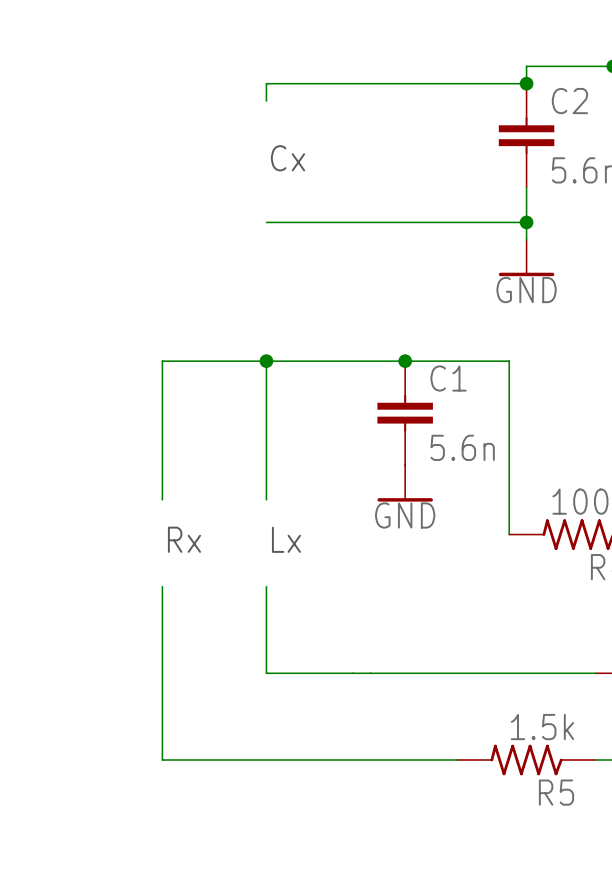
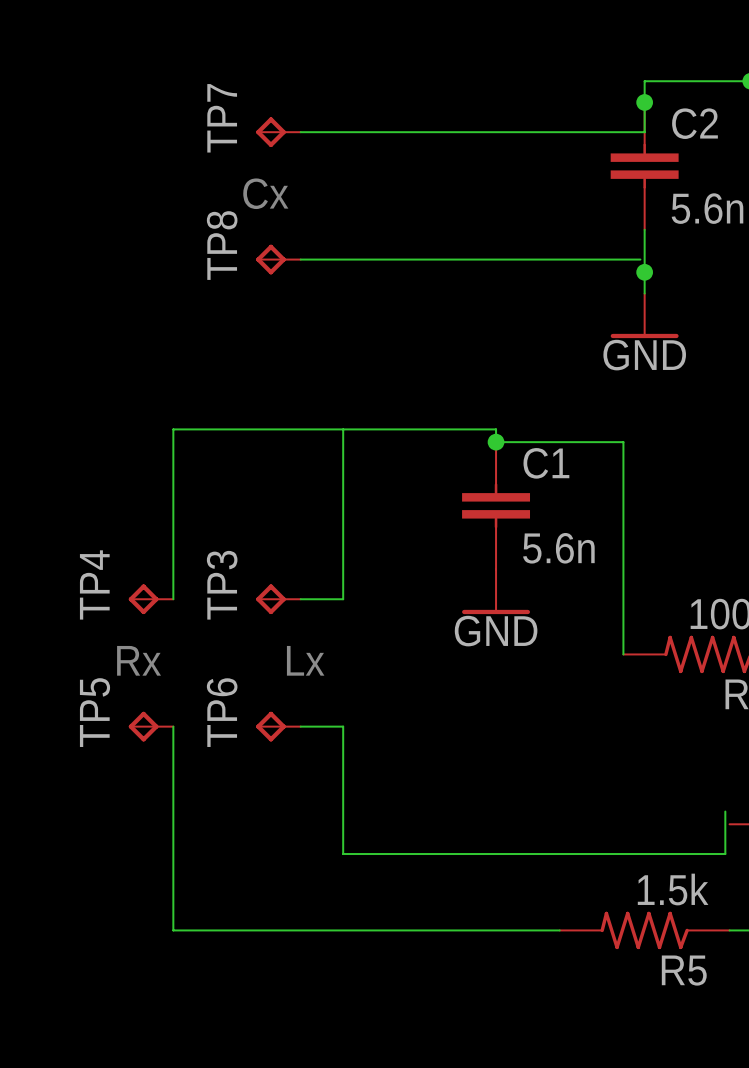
wire: (526, 83) (266, 83) (266, 101) -> (644, 102) (644, 132) (300, 132)
TP7: none -> (278, 132)
text position: Cx (288, 158) -> Cx (265, 193)
TP8: none -> (278, 259)
wire: none -> (300, 259) (640, 259)
wire: (266, 222) (526, 222) -> none
wire: none -> (343, 429) (343, 599) (300, 599)
wire: (266, 361) (266, 499) -> none
junction: (266, 361) -> none
wire: (405, 361) (162, 361) (162, 499) -> (496, 442) (496, 429) (173, 429) (173, 599)
TP4: none -> (151, 599)
TP3: none -> (278, 599)
text position: Rx (184, 539) -> Rx (139, 660)
text position: Lx (286, 539) -> Lx (305, 660)
wire: (162, 586) (162, 760) -> (173, 726) (173, 930) (198, 930)
wire: (266, 586) (266, 673) (595, 673) -> none
TP5: none -> (151, 726)
TP6: none -> (278, 726)
wire: none -> (300, 726) (343, 726) (343, 854) (725, 854) (725, 811)

